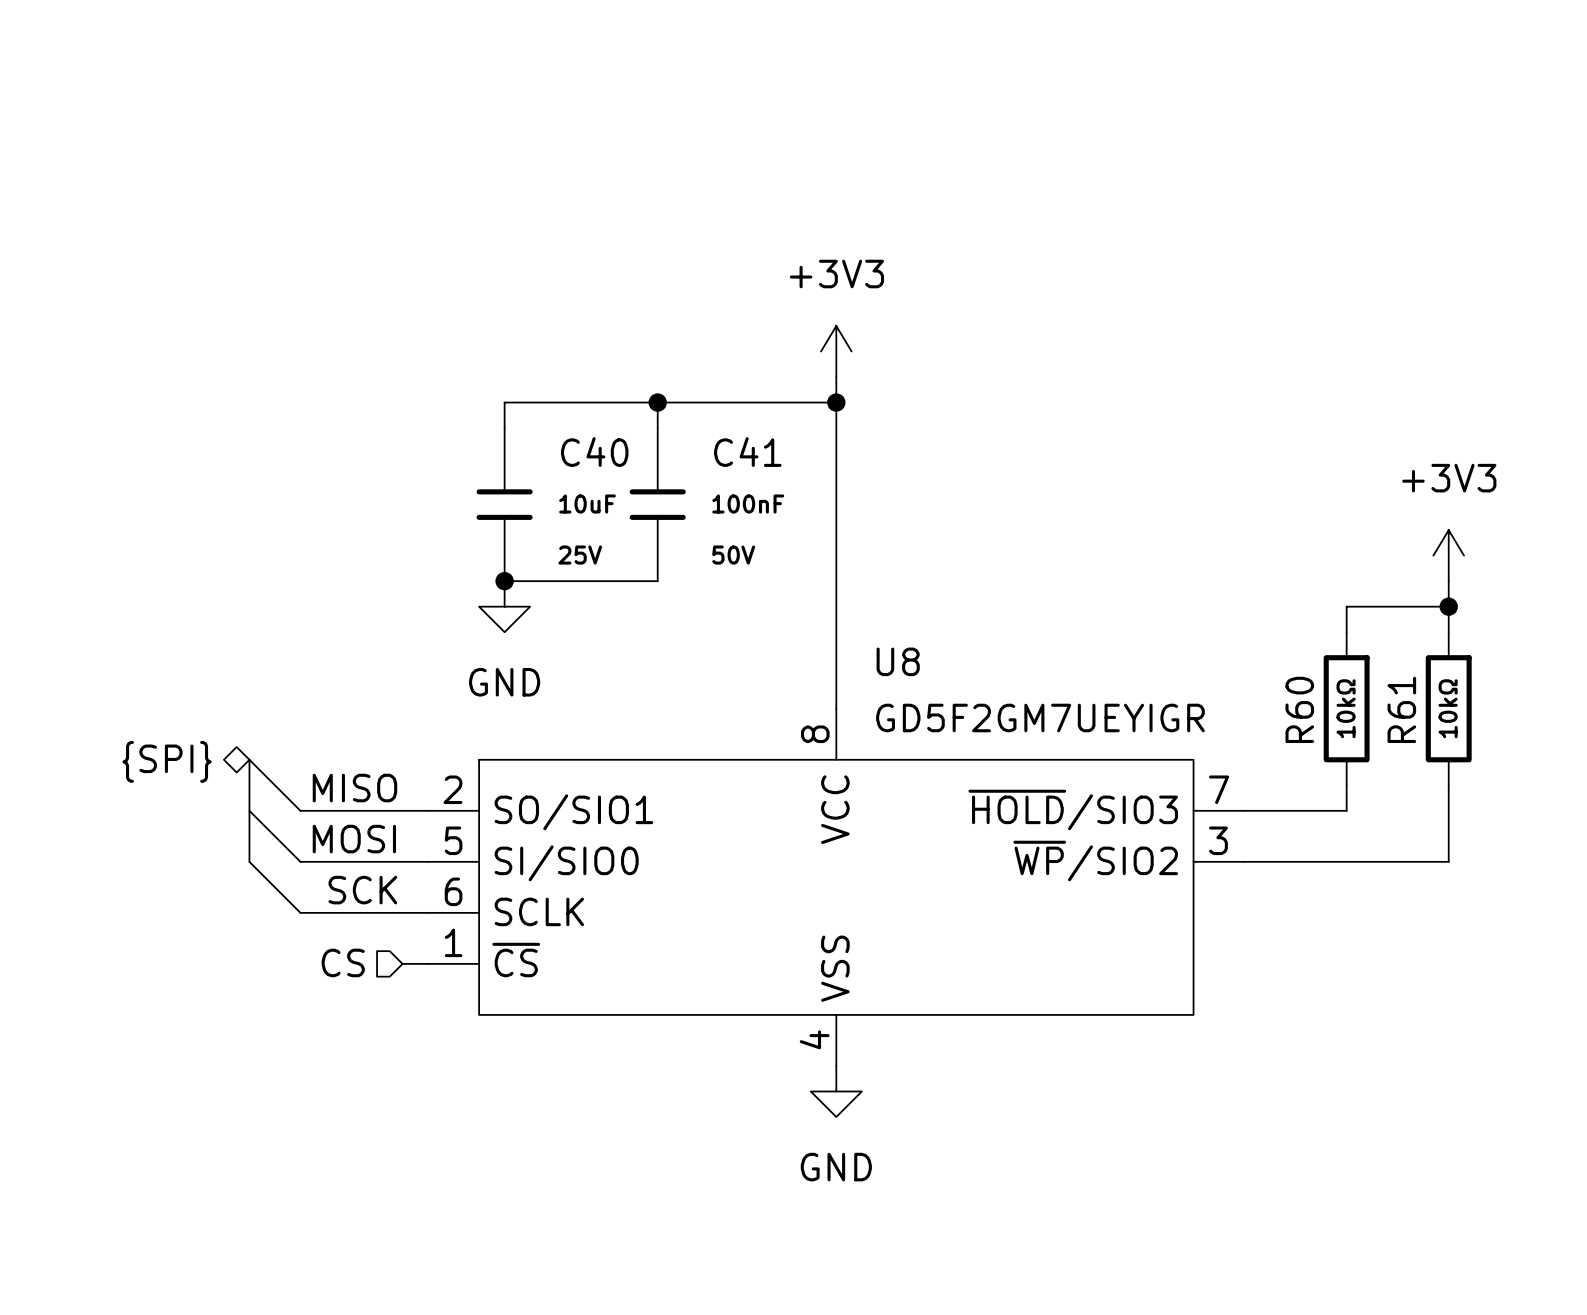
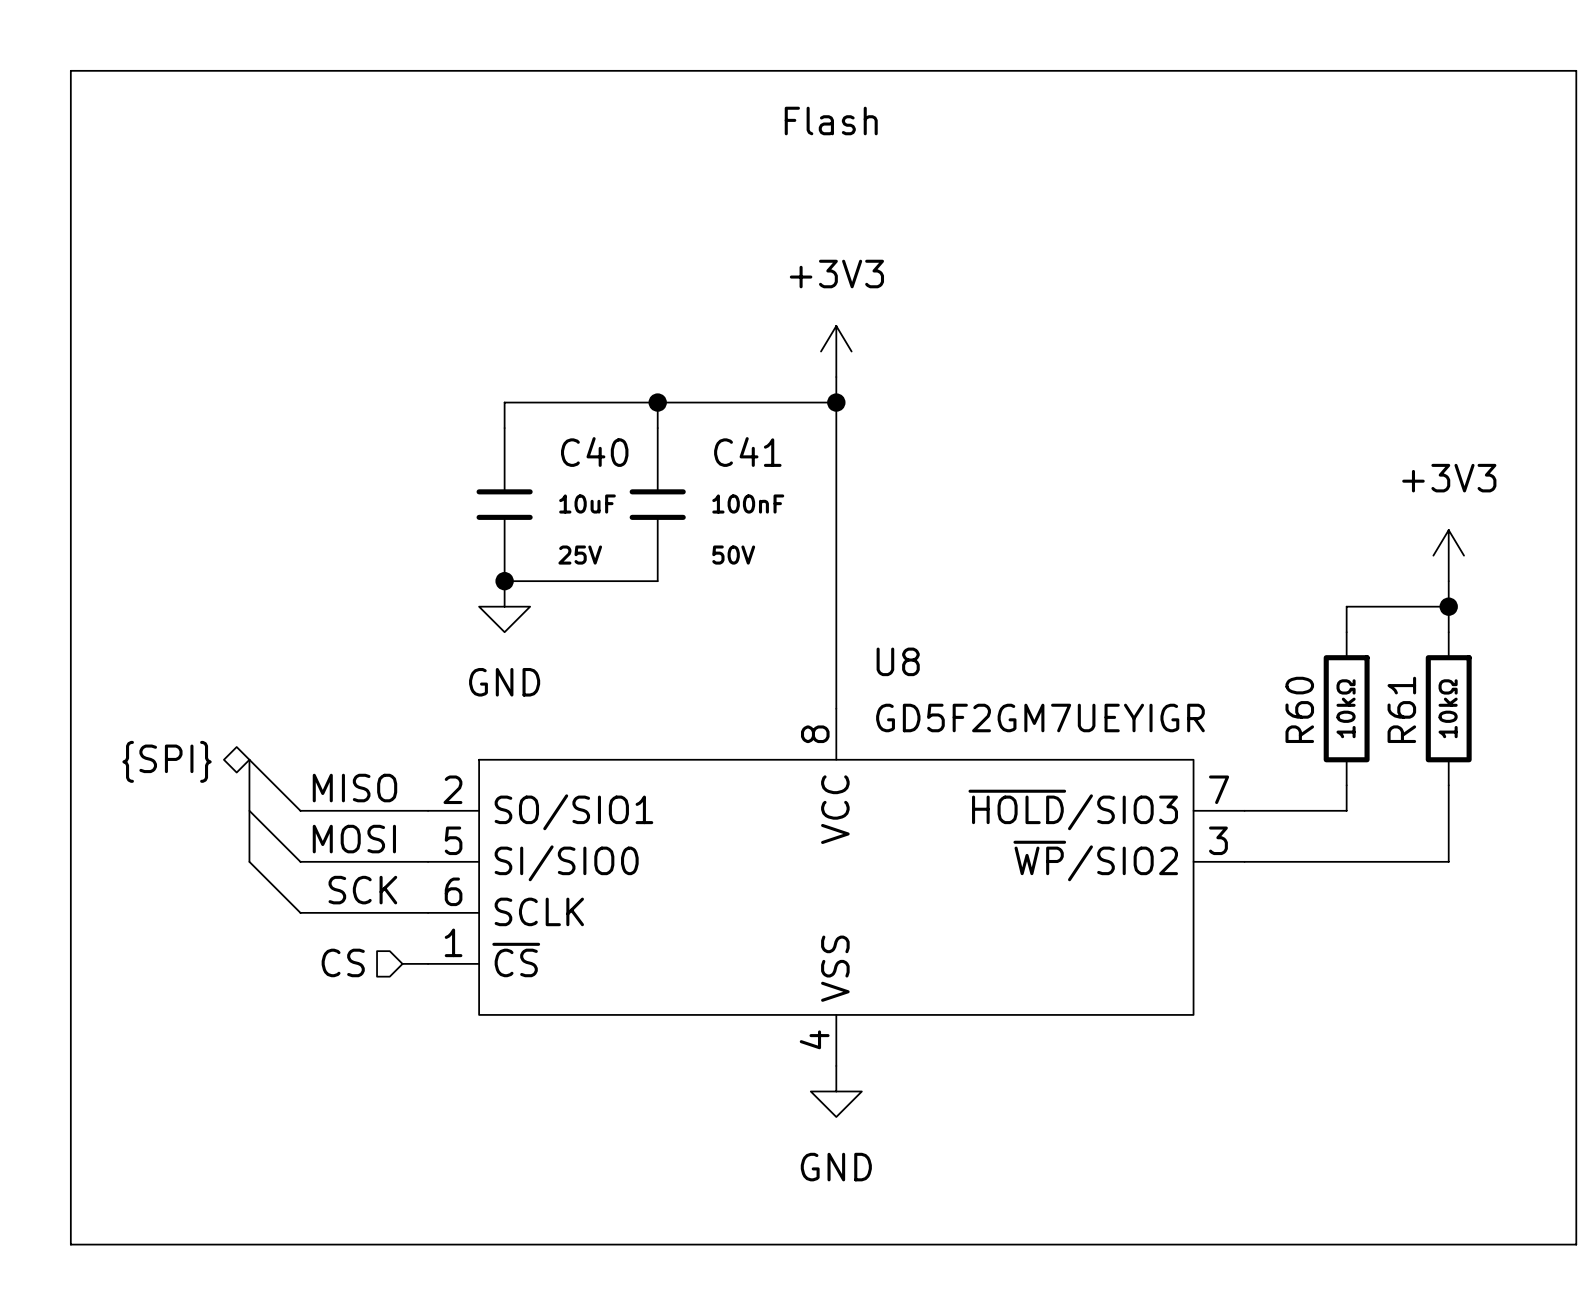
line: none -> (70, 70) (1576, 70) (1576, 1244) (70, 1244) (70, 70)
text: none -> Flash (831, 120)

